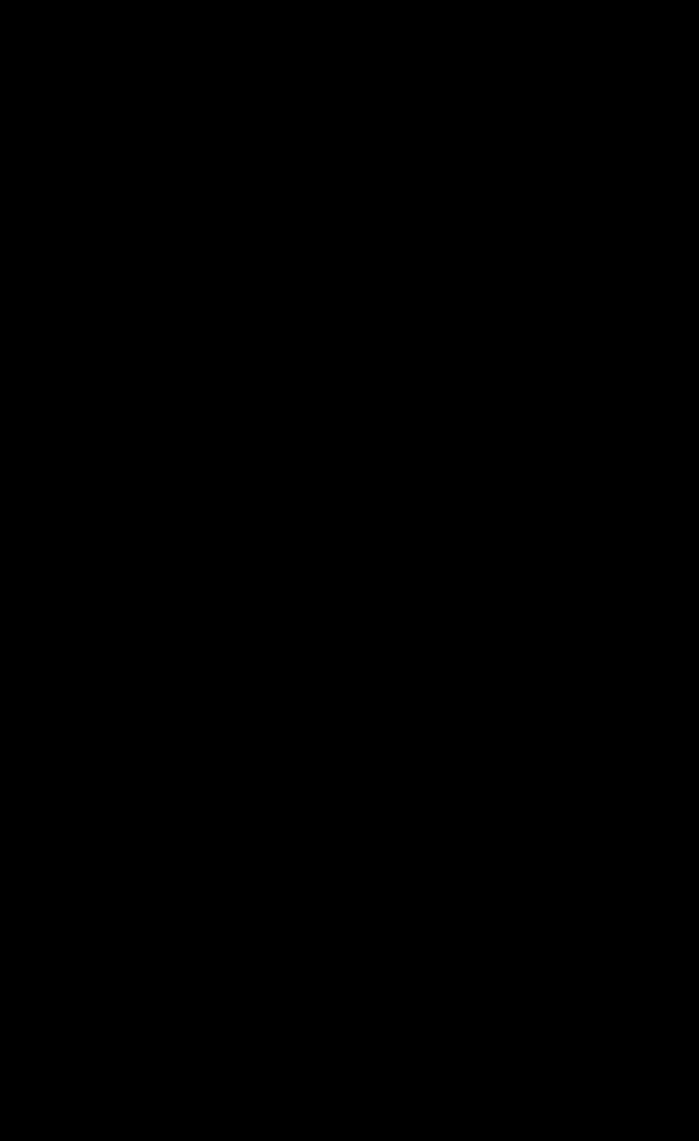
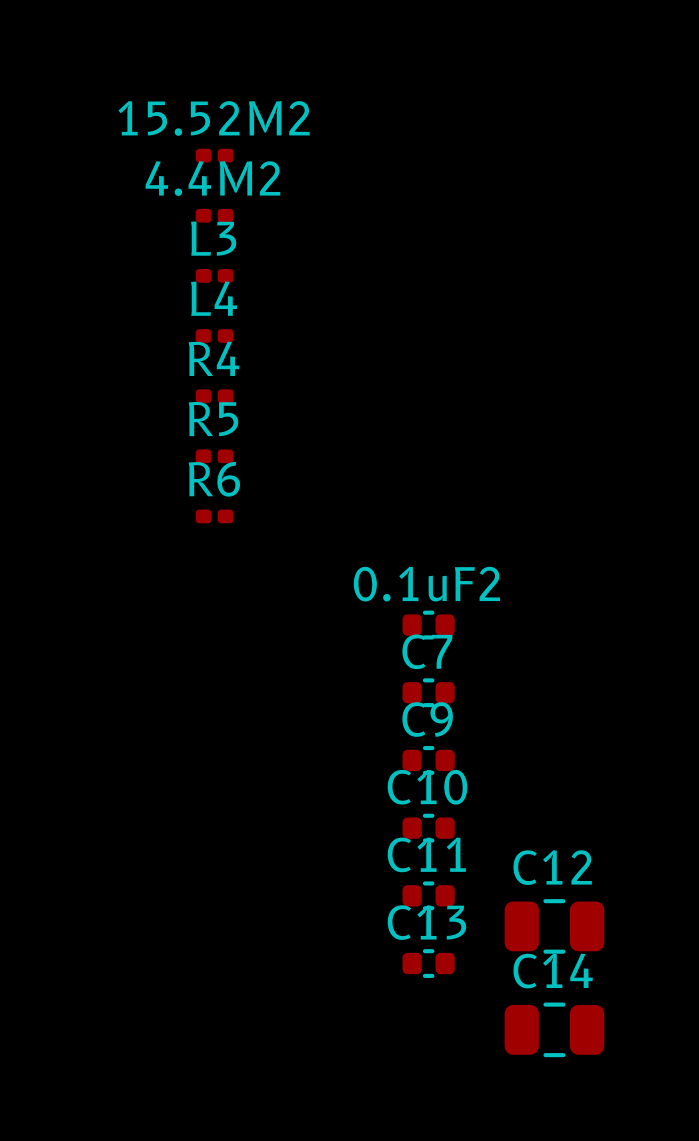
15.52M2: none -> (214, 155)
4.4M2: none -> (214, 215)
L3: none -> (214, 275)
L4: none -> (214, 336)
R4: none -> (214, 396)
R5: none -> (214, 456)
R6: none -> (214, 516)
0.1uF2: none -> (428, 625)
C7: none -> (428, 692)
C9: none -> (428, 760)
C10: none -> (428, 828)
C11: none -> (428, 895)
C12: none -> (554, 926)
C13: none -> (428, 963)
C14: none -> (554, 1029)

